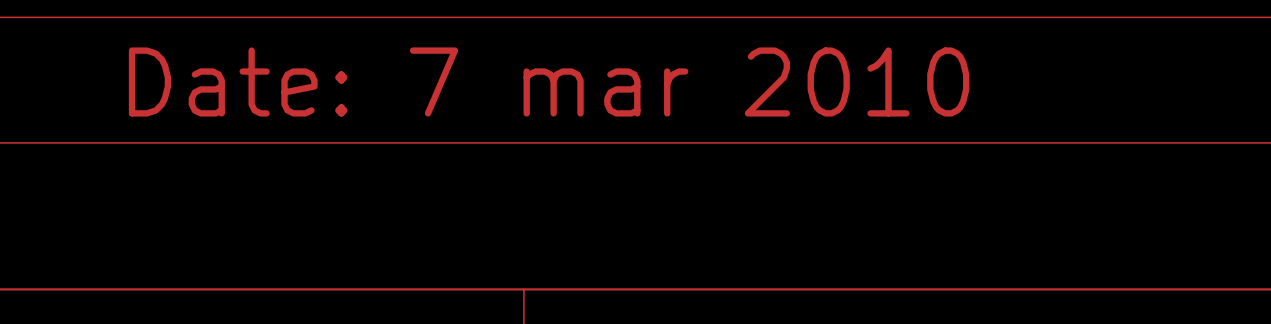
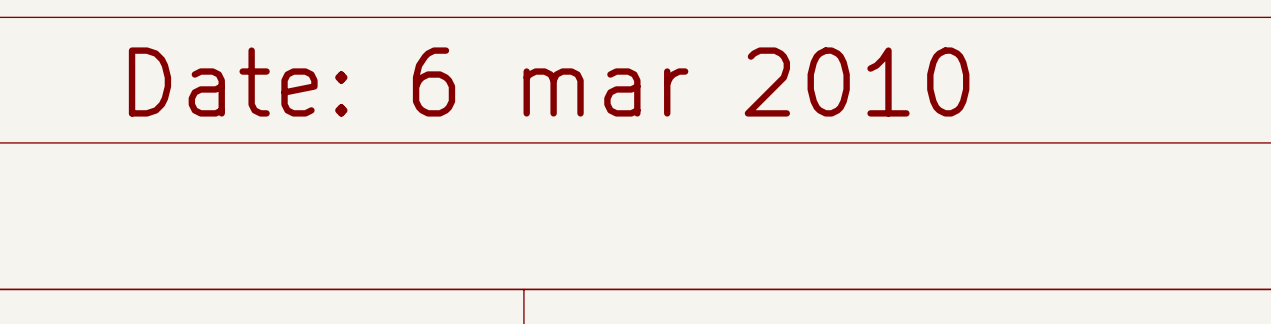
title block: Date: 7 mar 2010 (549, 81) -> Date: 6 mar 2010 (549, 81)

